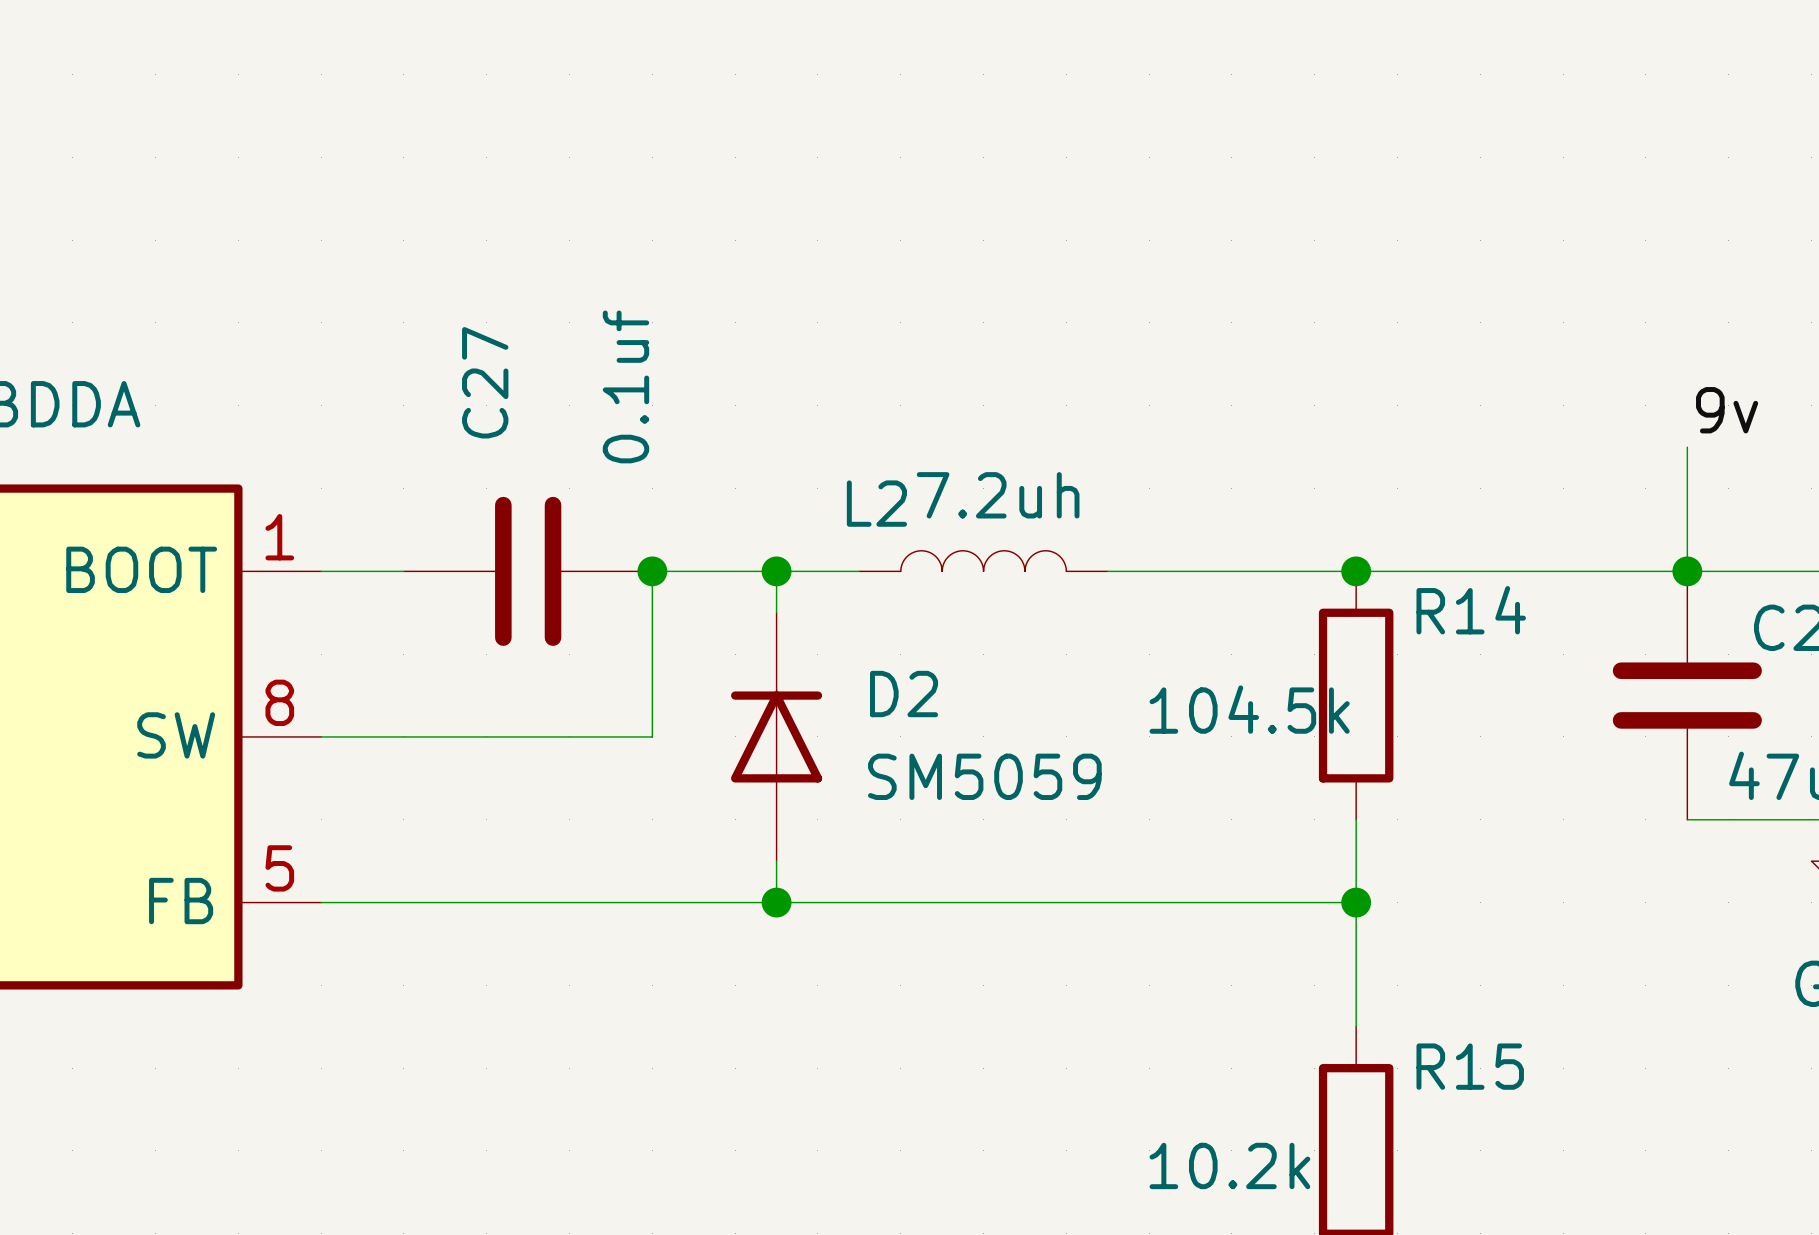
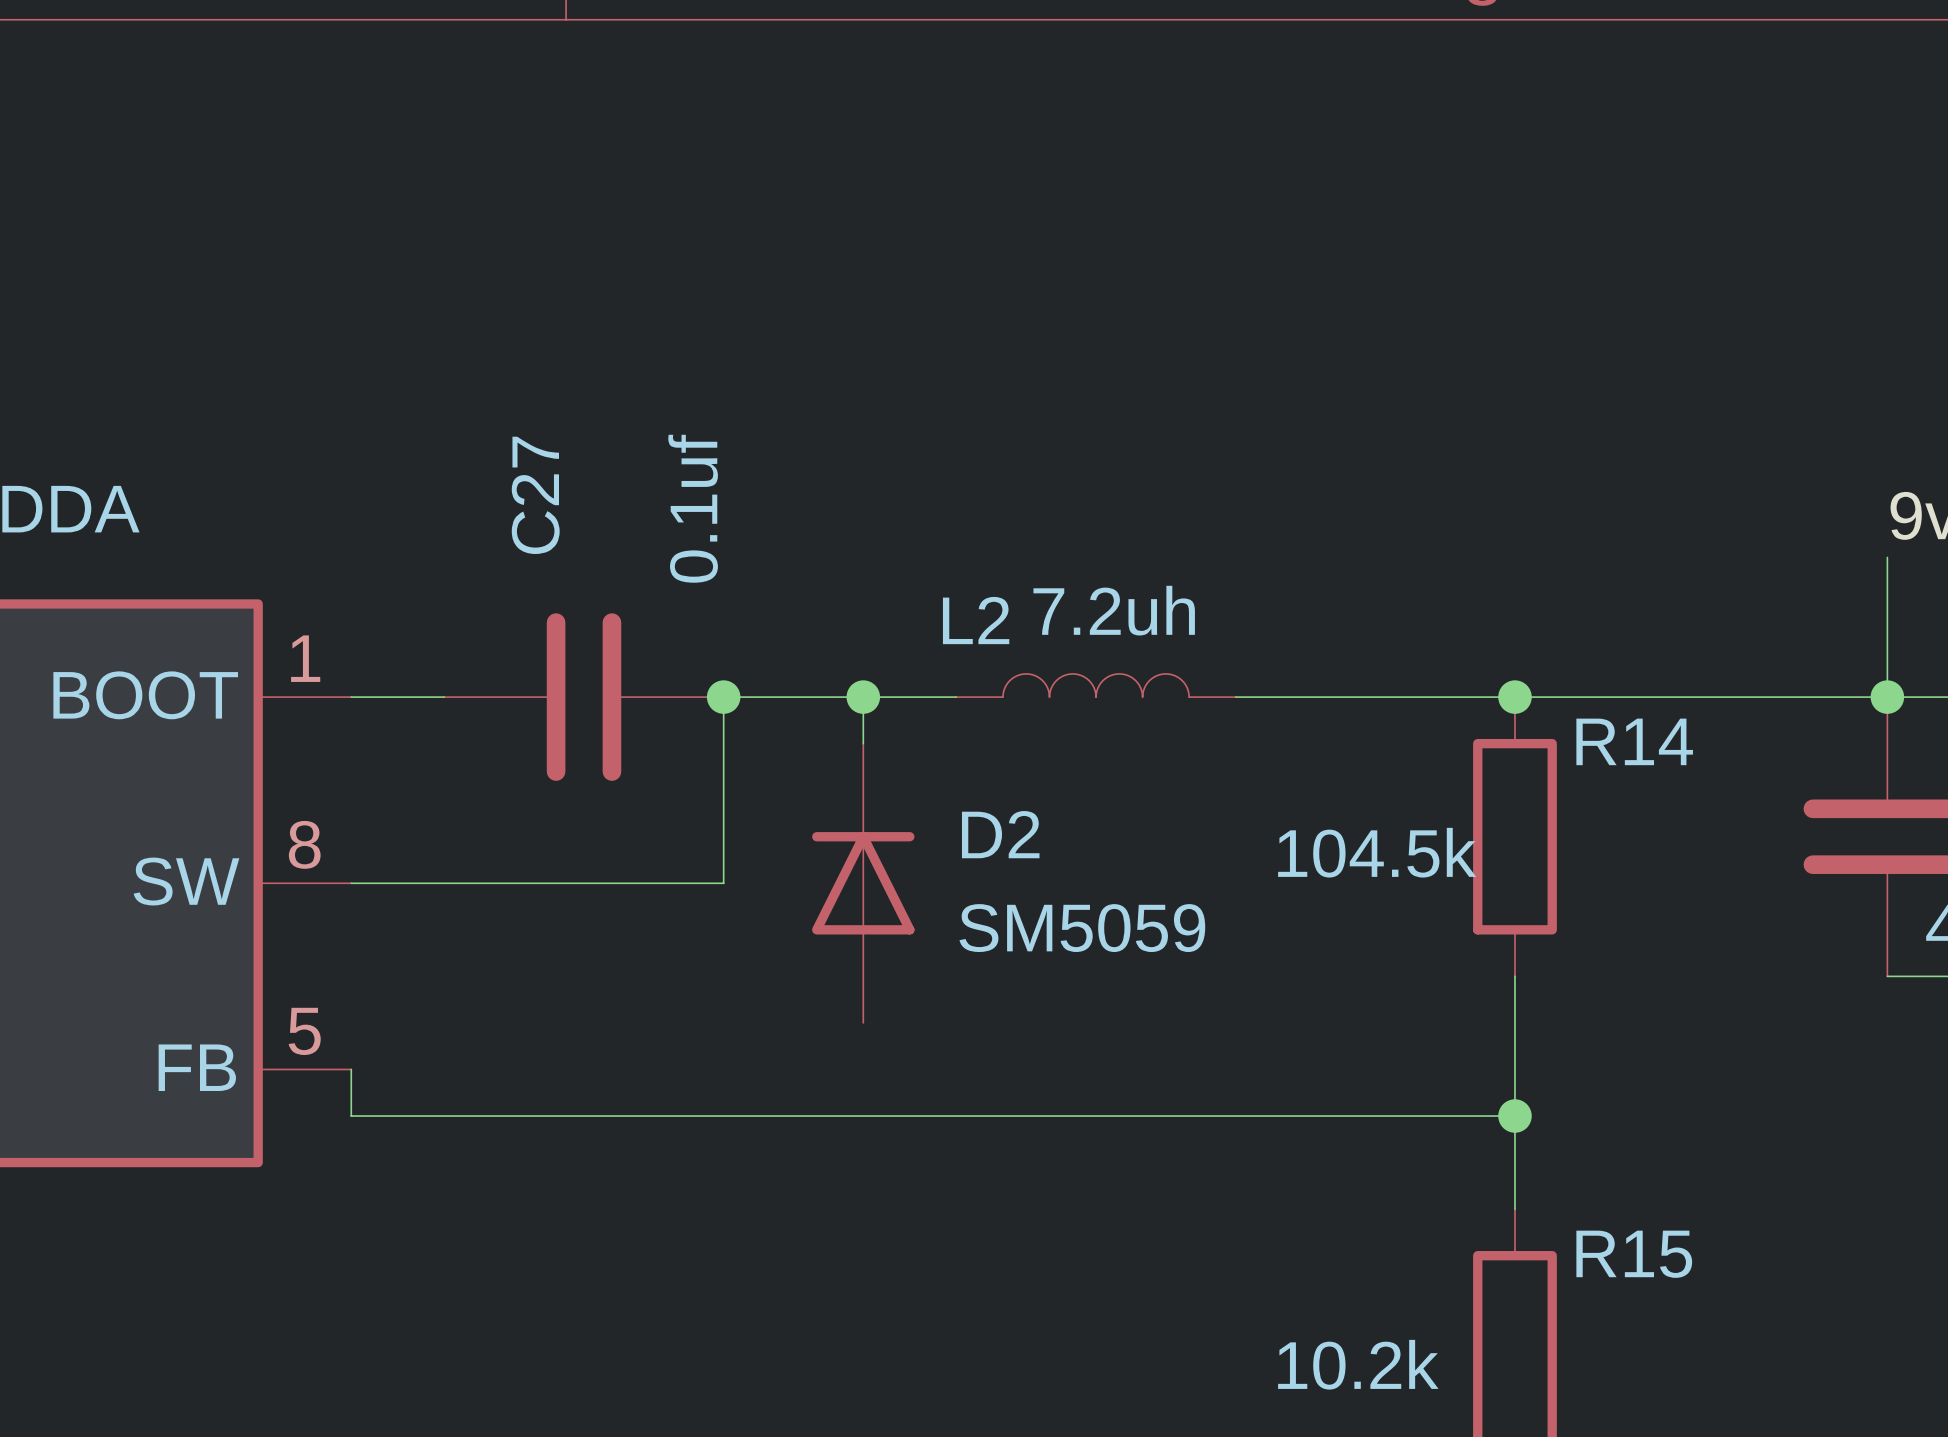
wire: (776, 861) (776, 902) -> none
wire: (321, 902) (1356, 902) -> (351, 1069) (351, 1116) (1514, 1116)
junction: (776, 902) -> none
junction position: (1356, 902) -> (1514, 1116)

